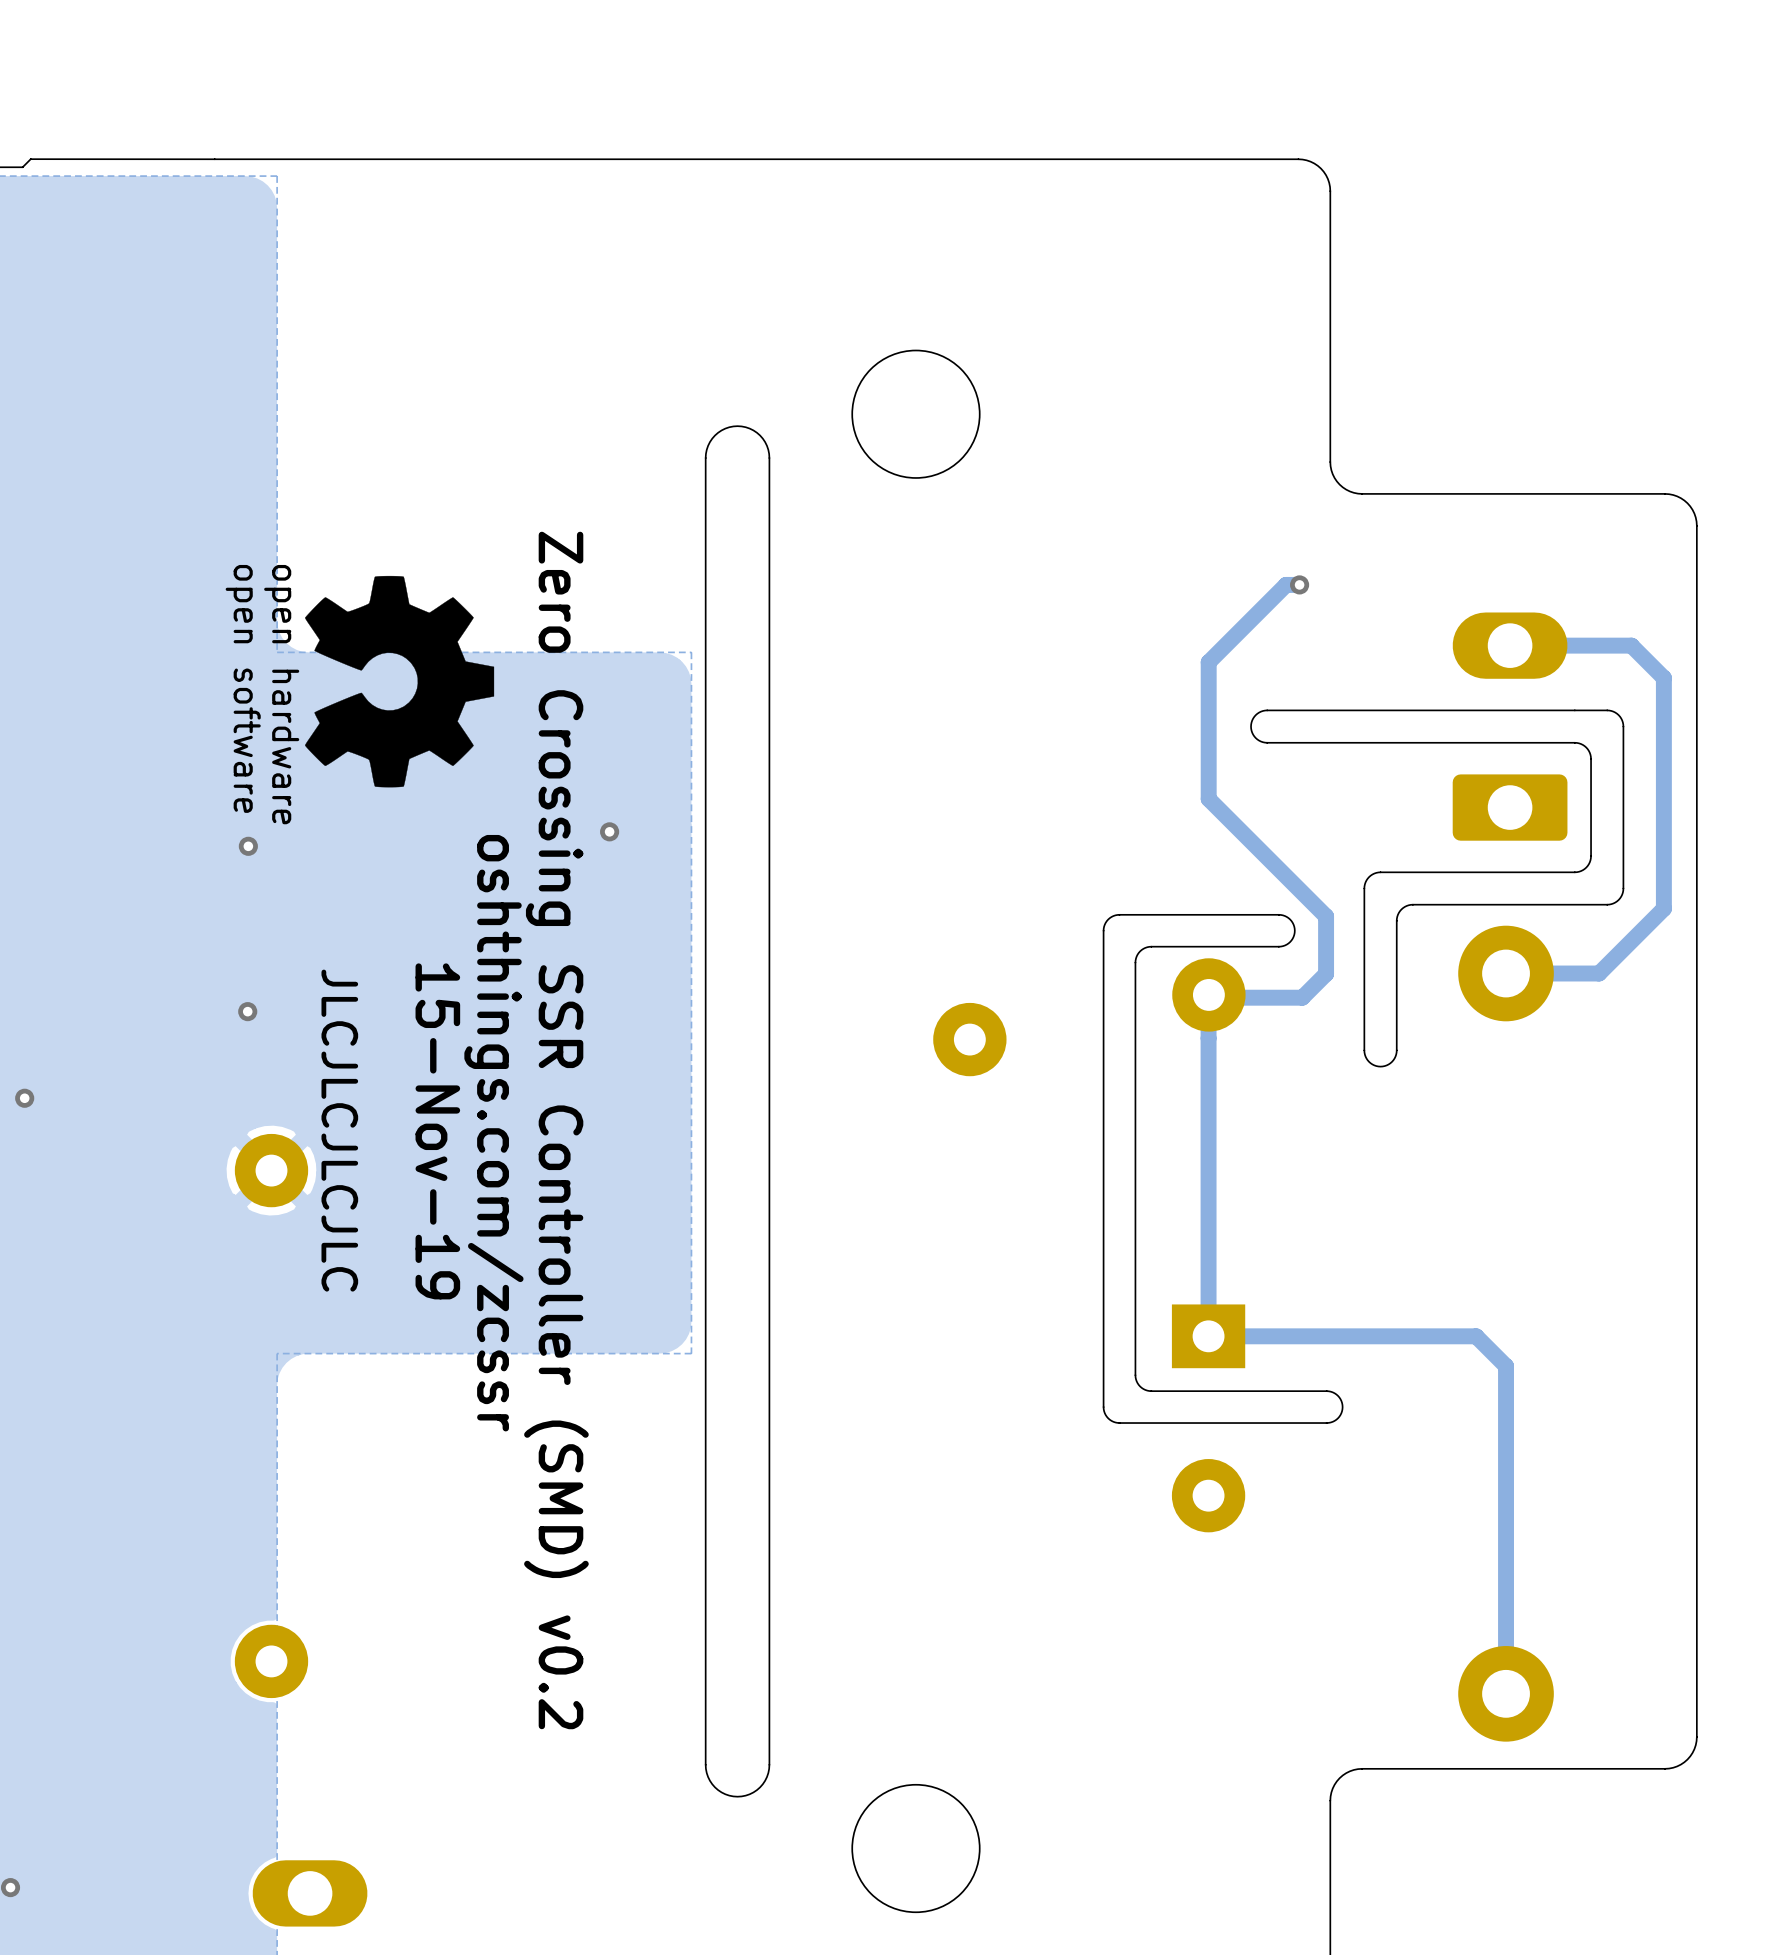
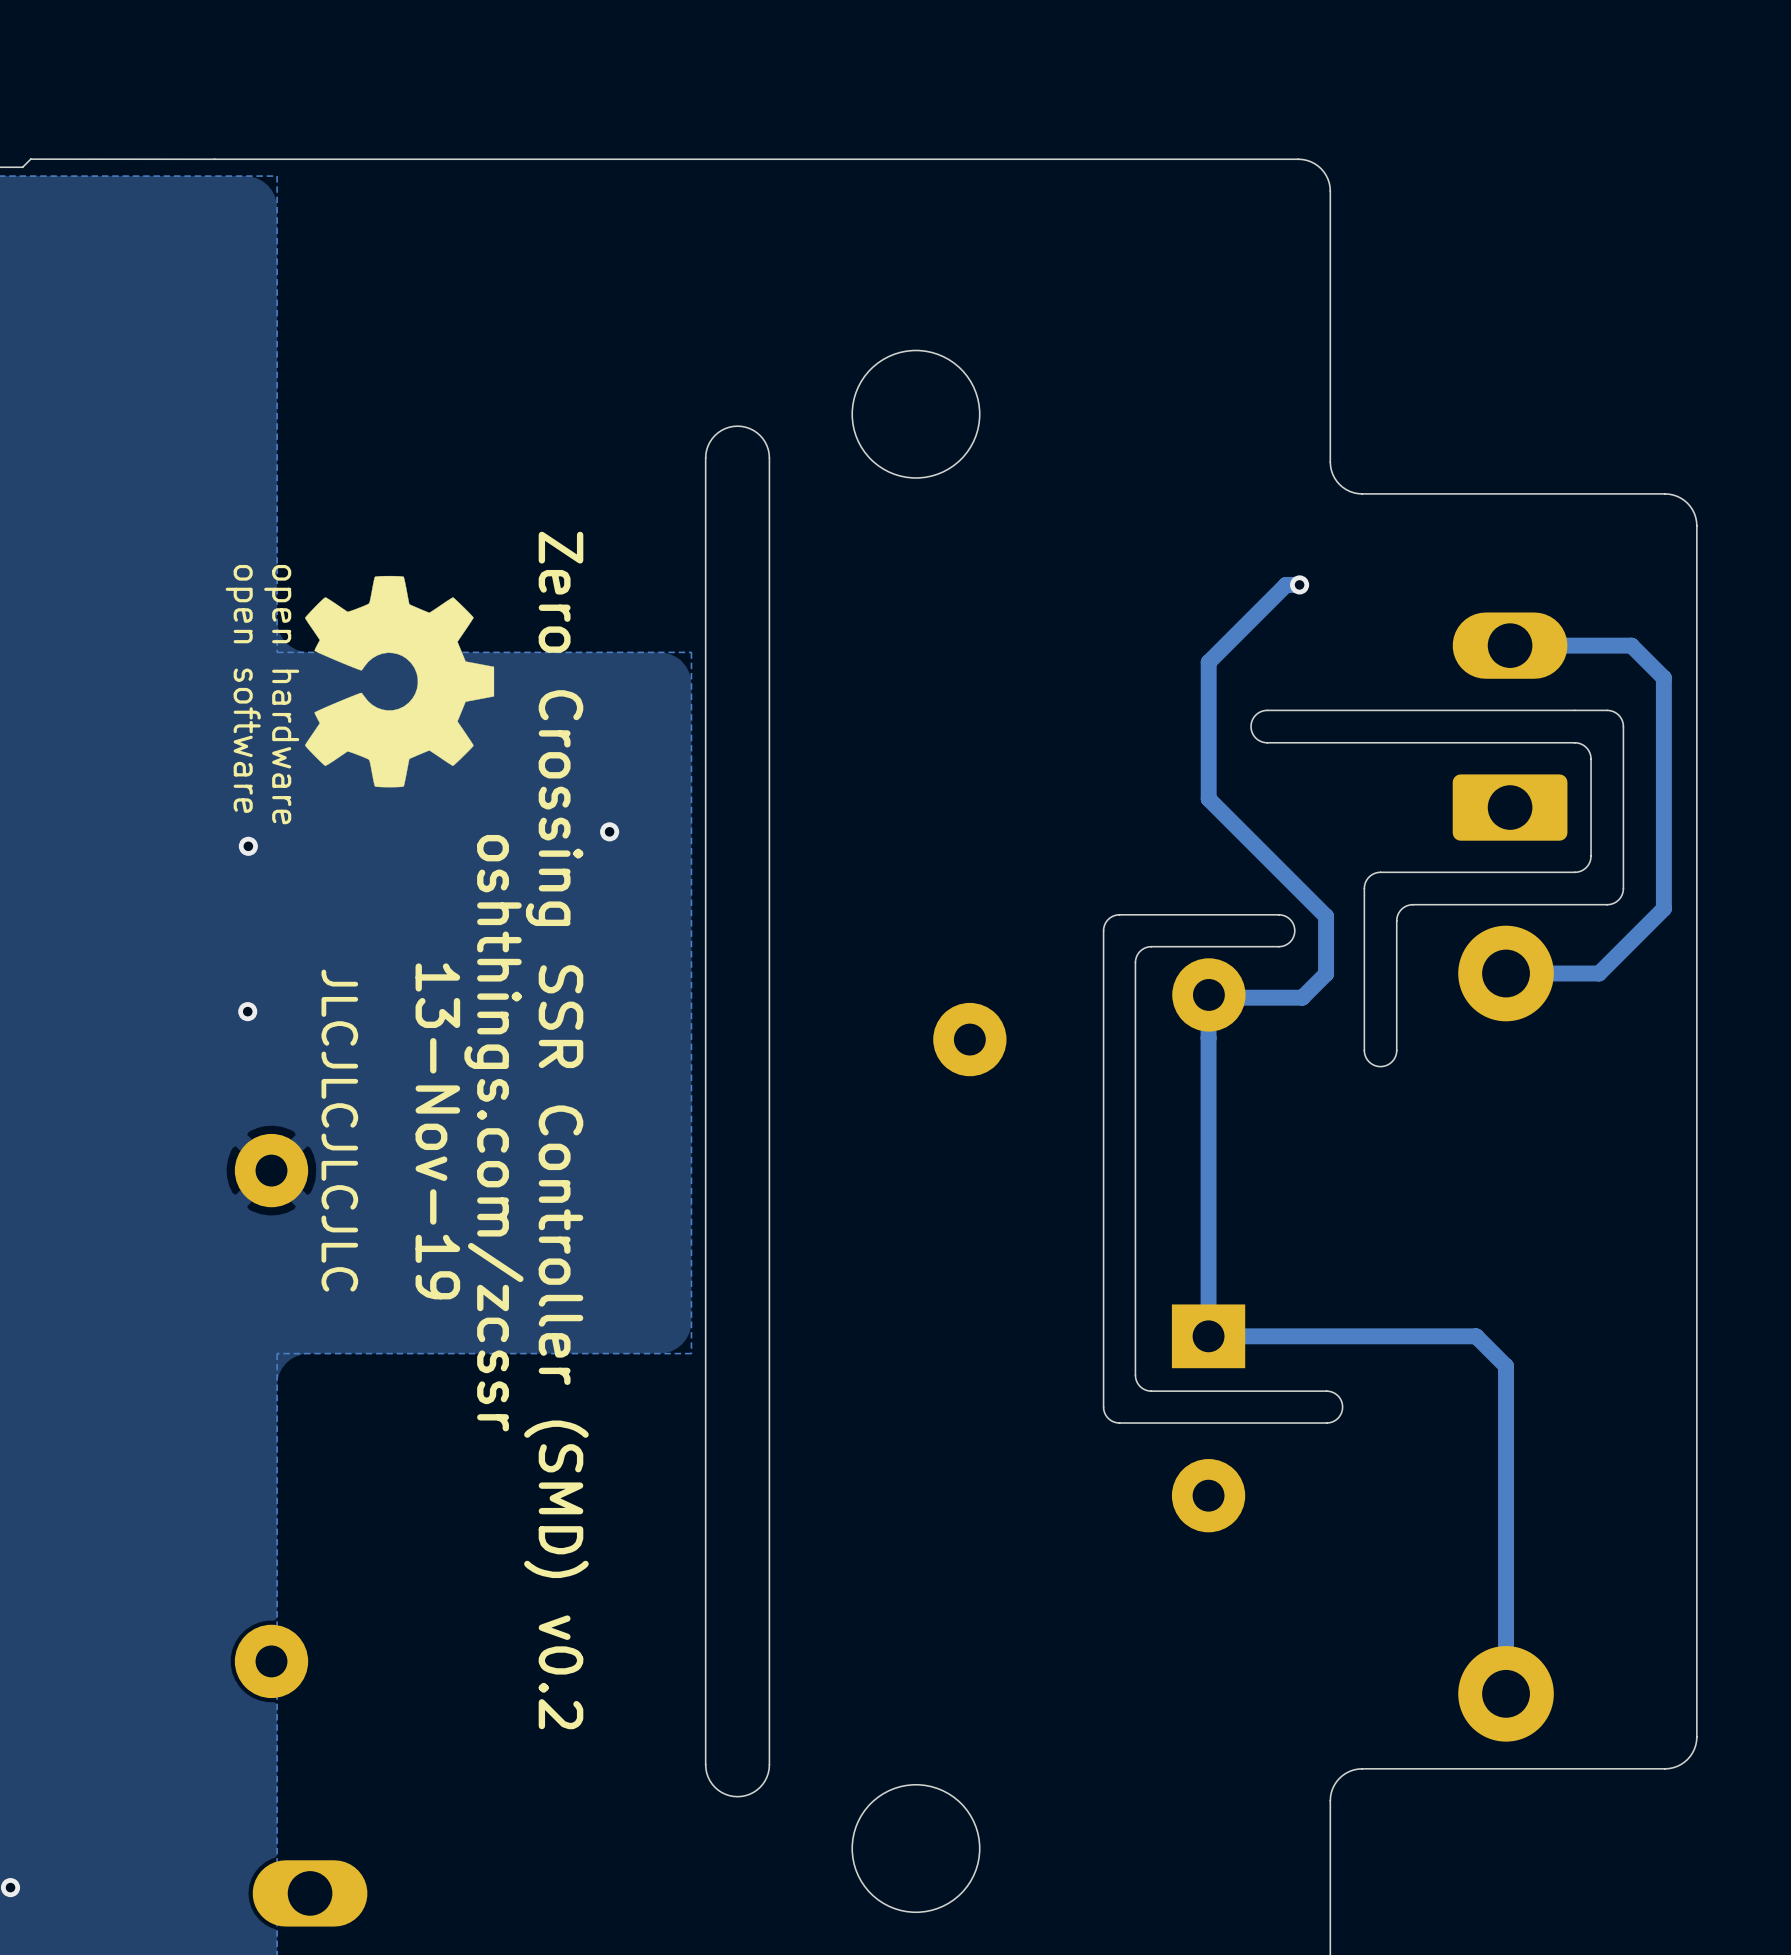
via: (24, 1098) -> none
text: 15-Nov-19 (437, 1131) -> 13-Nov-19 (437, 1131)

